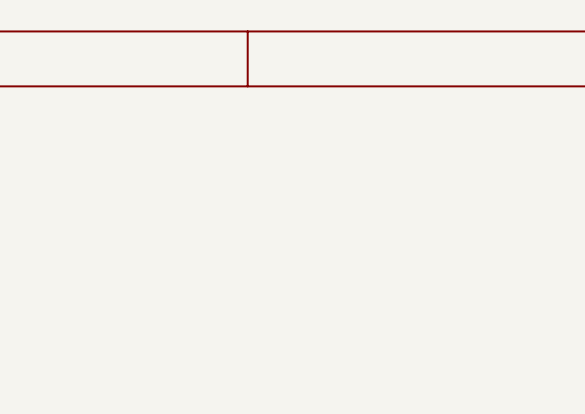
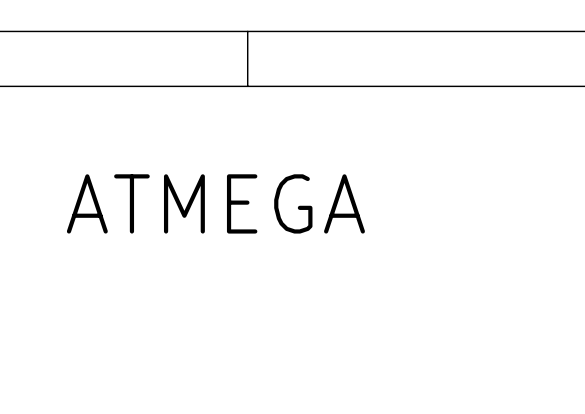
text: none -> ATMEGA (215, 203)

